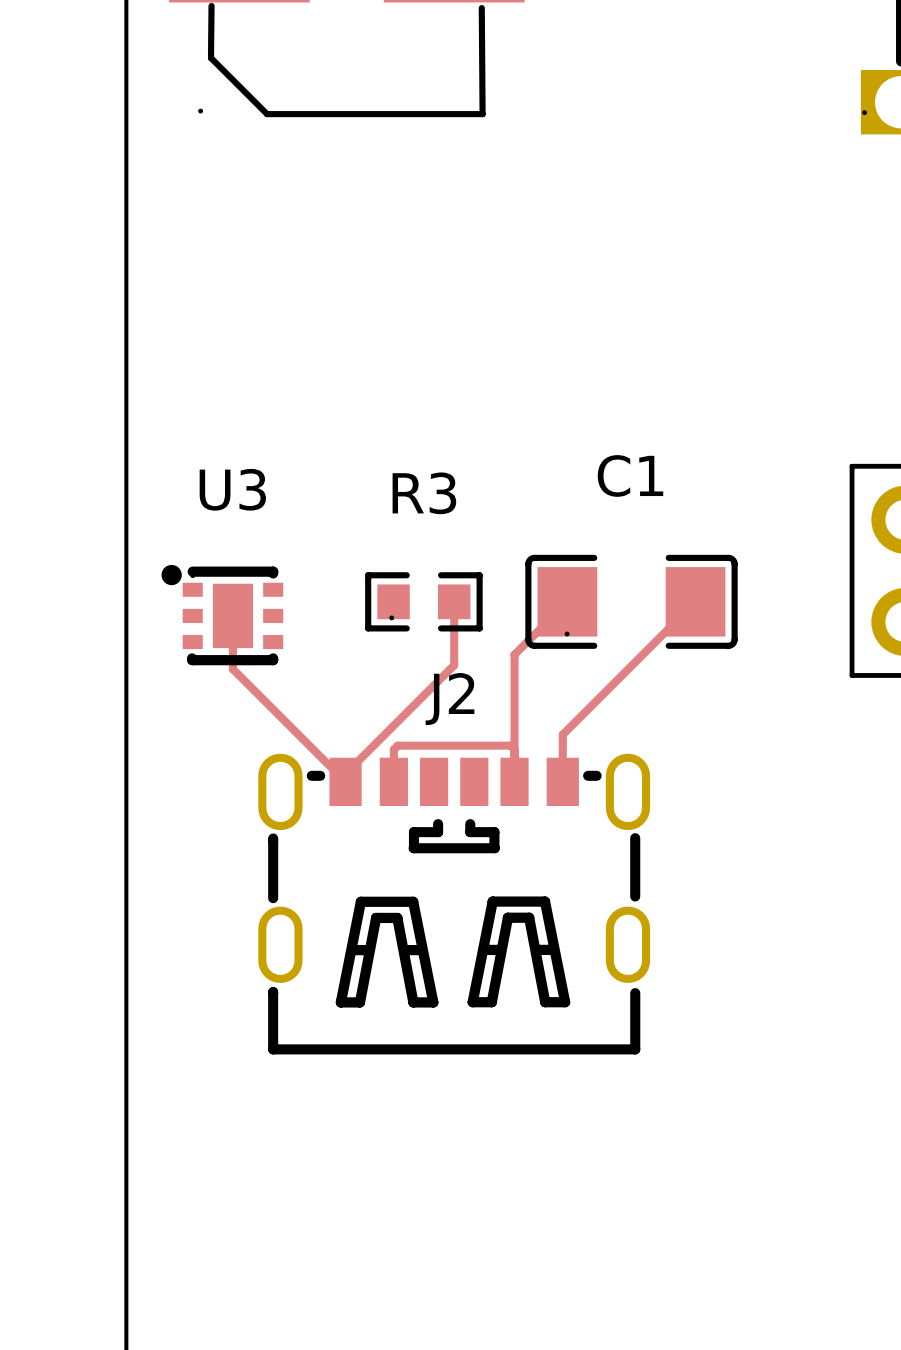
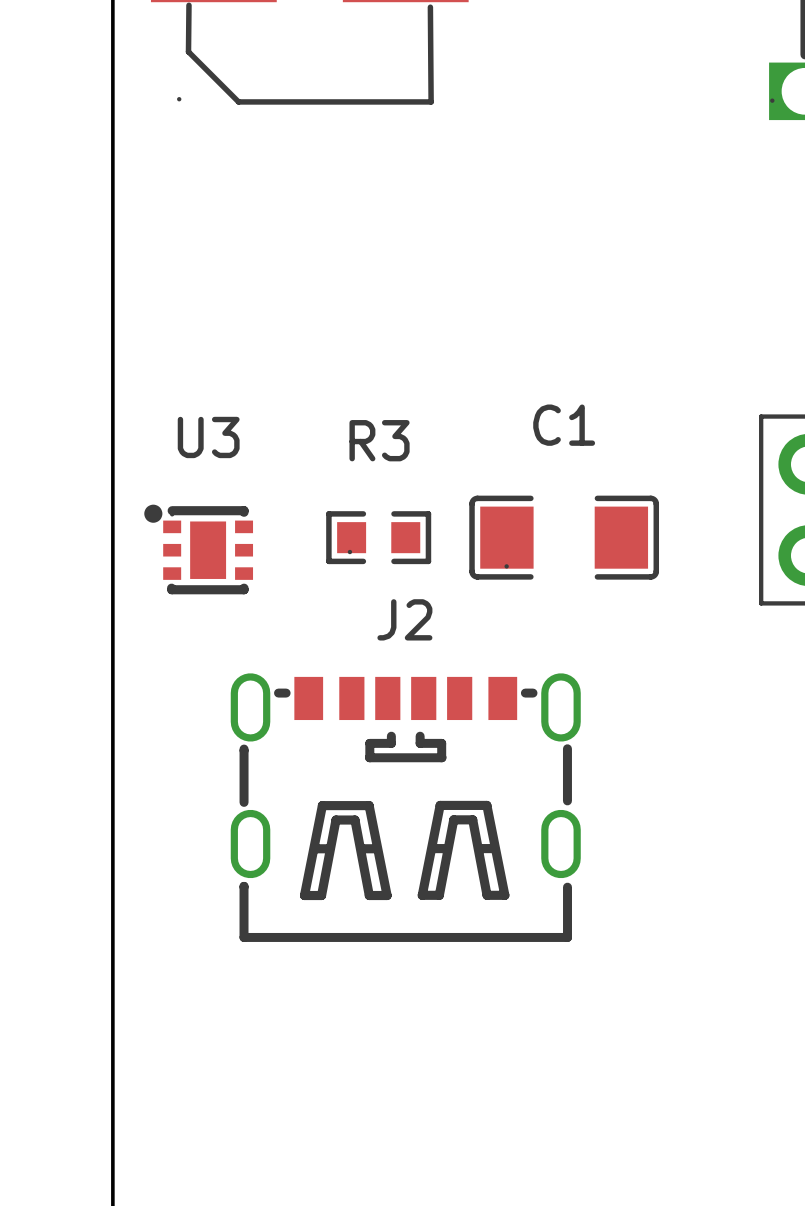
track: (454, 601) (454, 665) (345, 773) (345, 781) (232, 669) (232, 615) -> none
track: (567, 601) (514, 654) (514, 781) -> none
track: (695, 601) (562, 734) (562, 781) -> none
track: (514, 749) (510, 745) (397, 745) (393, 749) (393, 781) -> none

